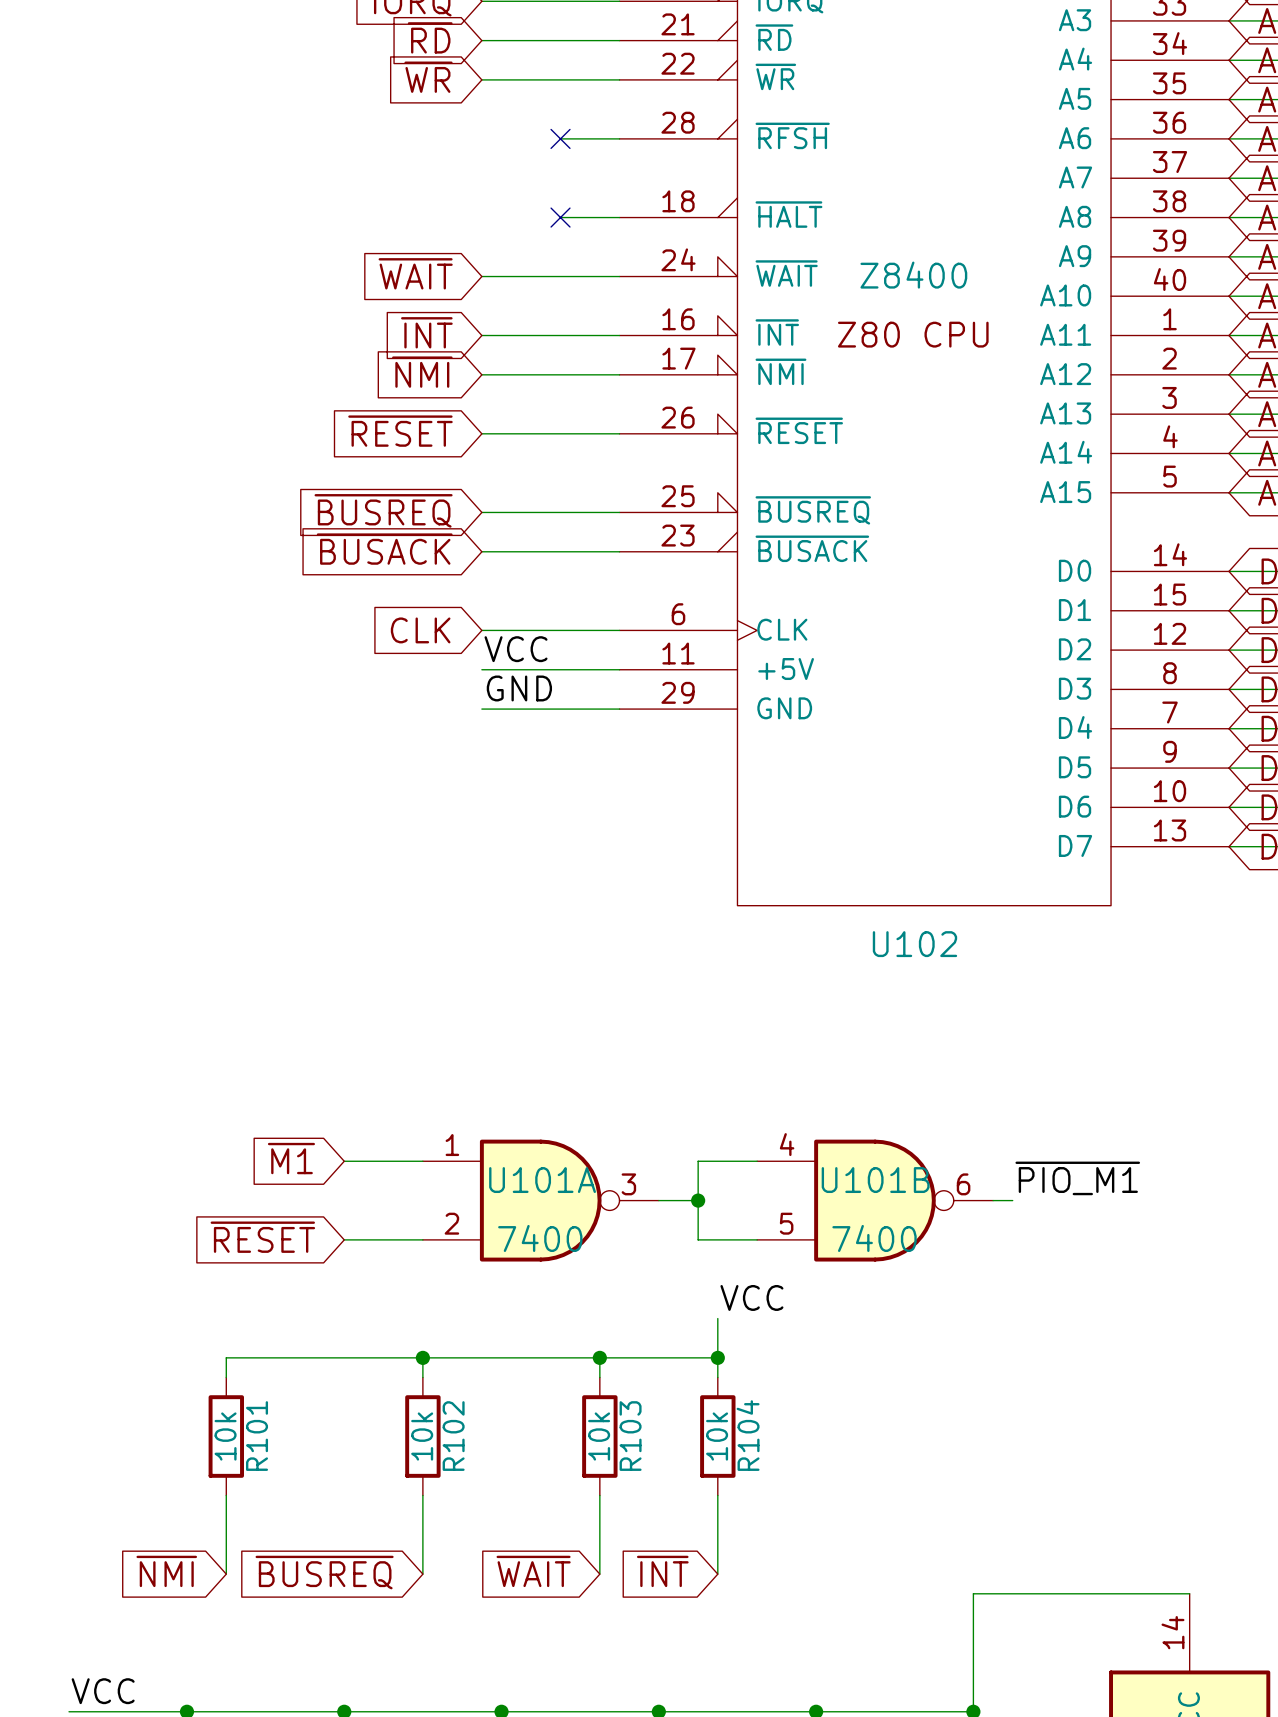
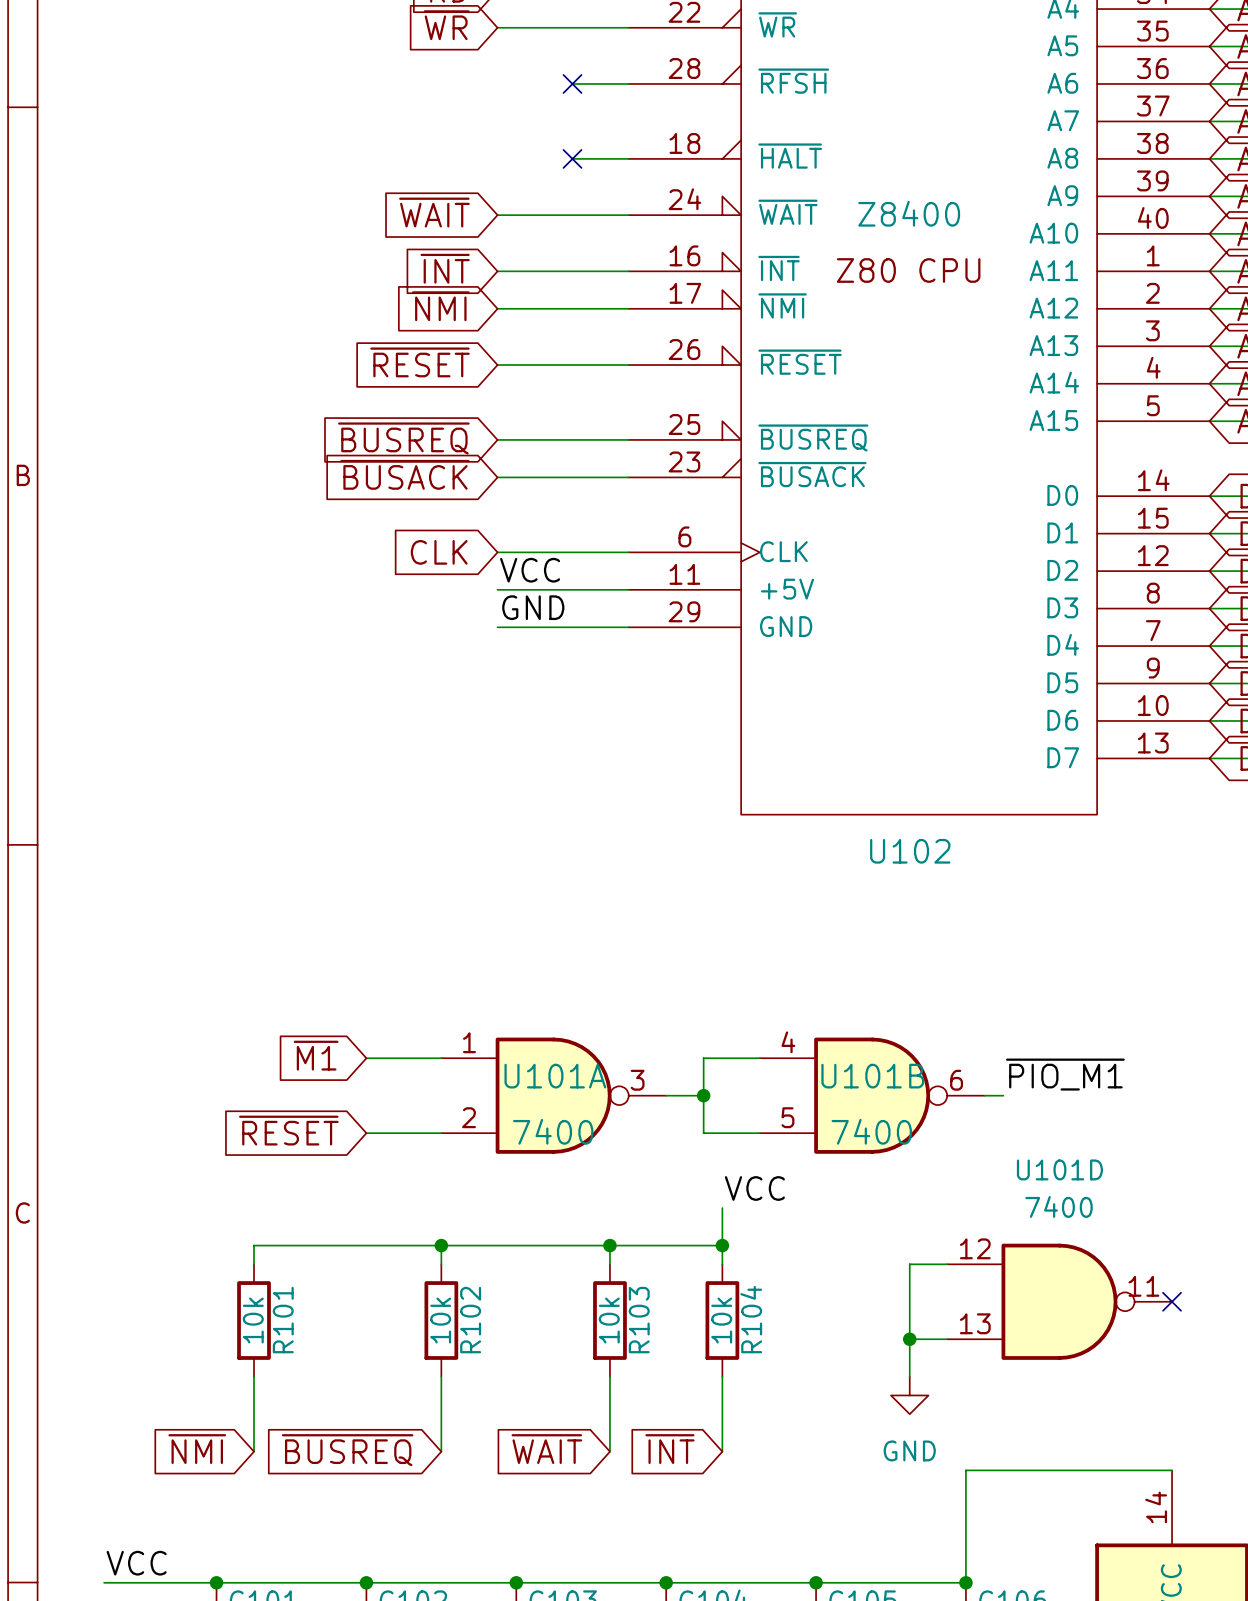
wire: none -> (947, 1264) (909, 1264) (909, 1376)
U101D: none -> 7400 (1059, 1301)
no-connect mark: none -> (1172, 1301)
wire: none -> (909, 1339) (947, 1339)
junction: none -> (909, 1339)
power symbol: none -> GND (909, 1395)

